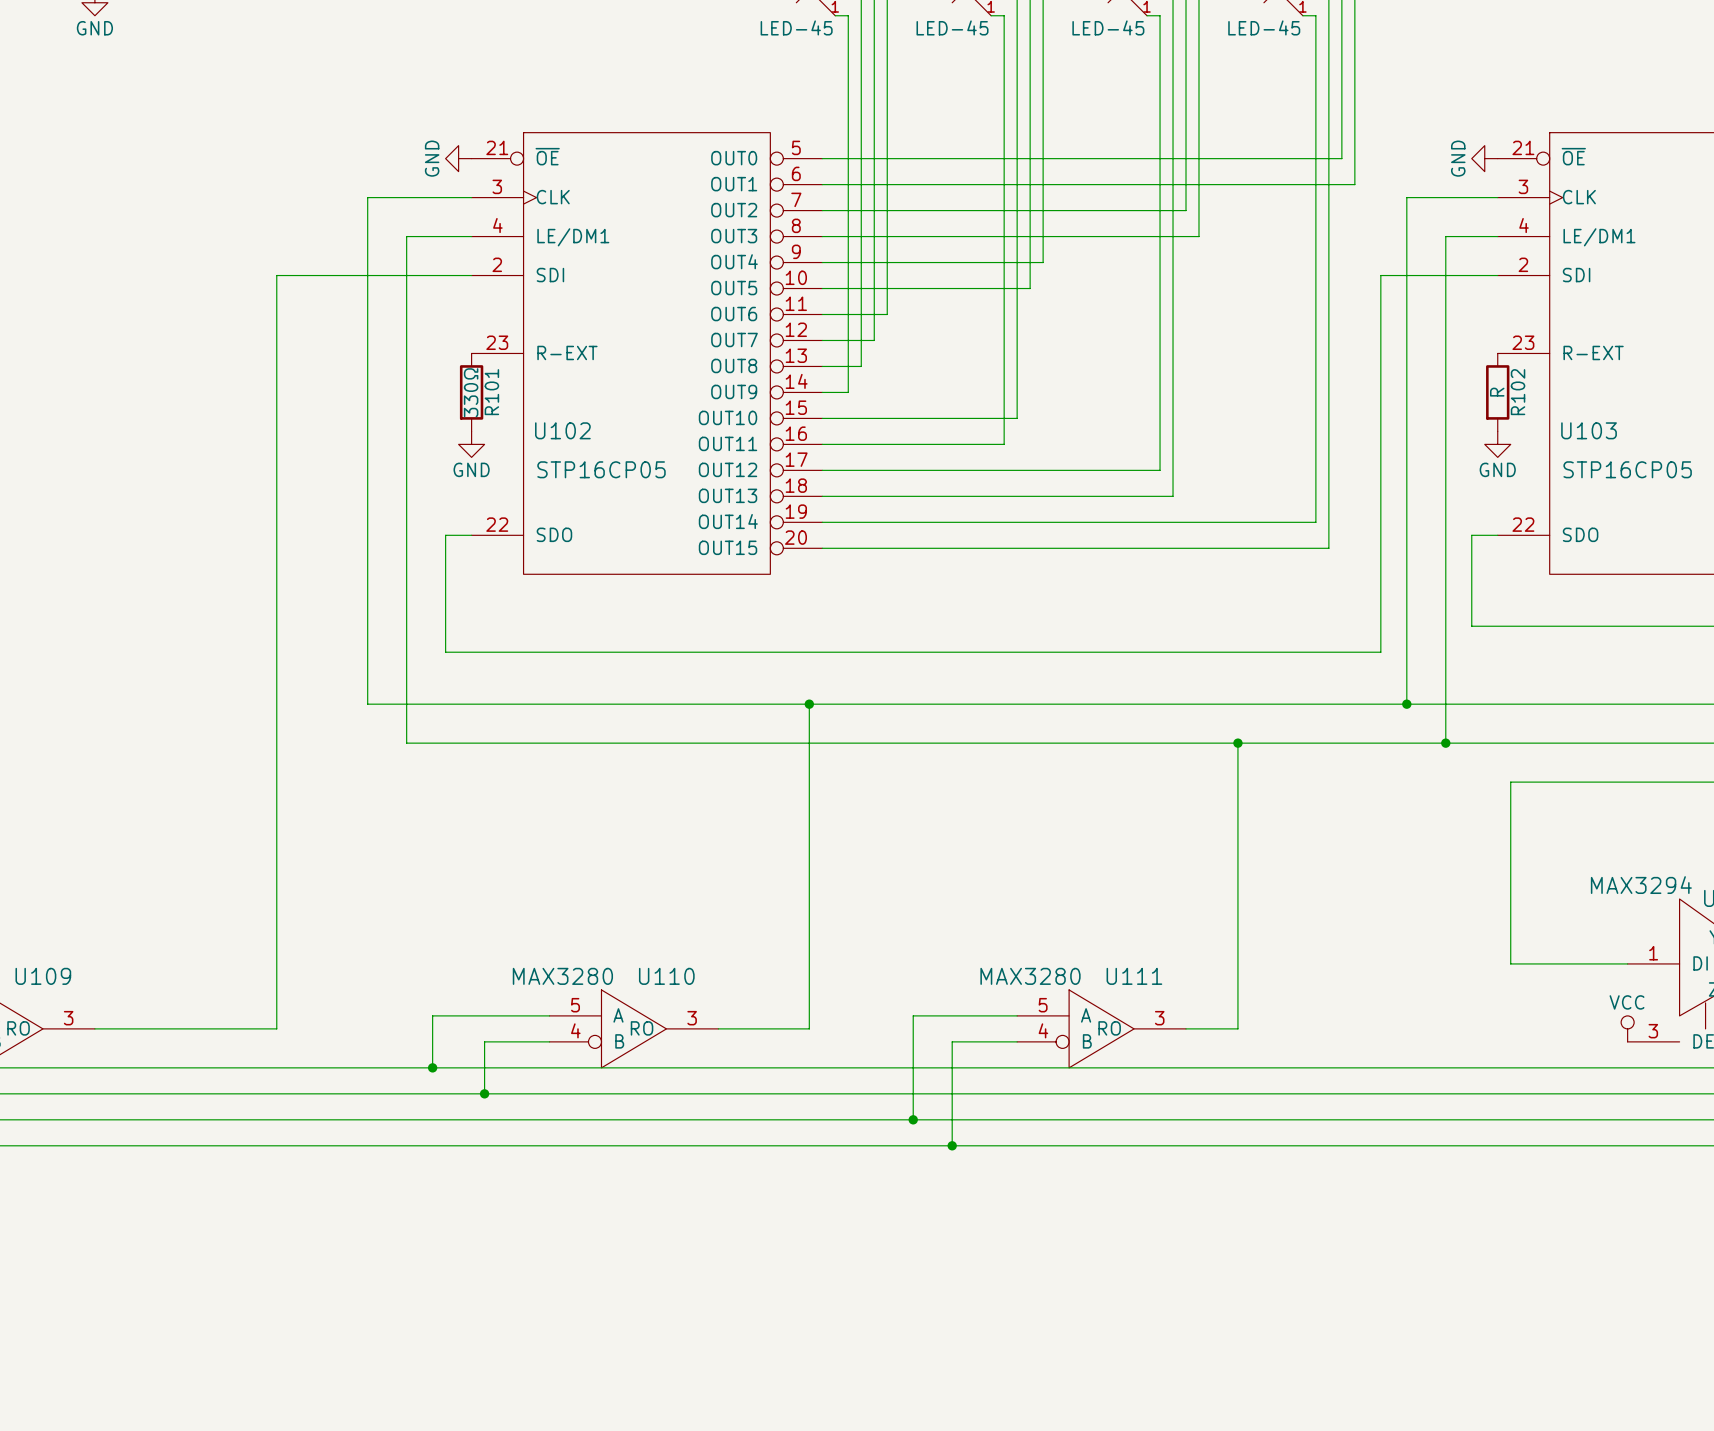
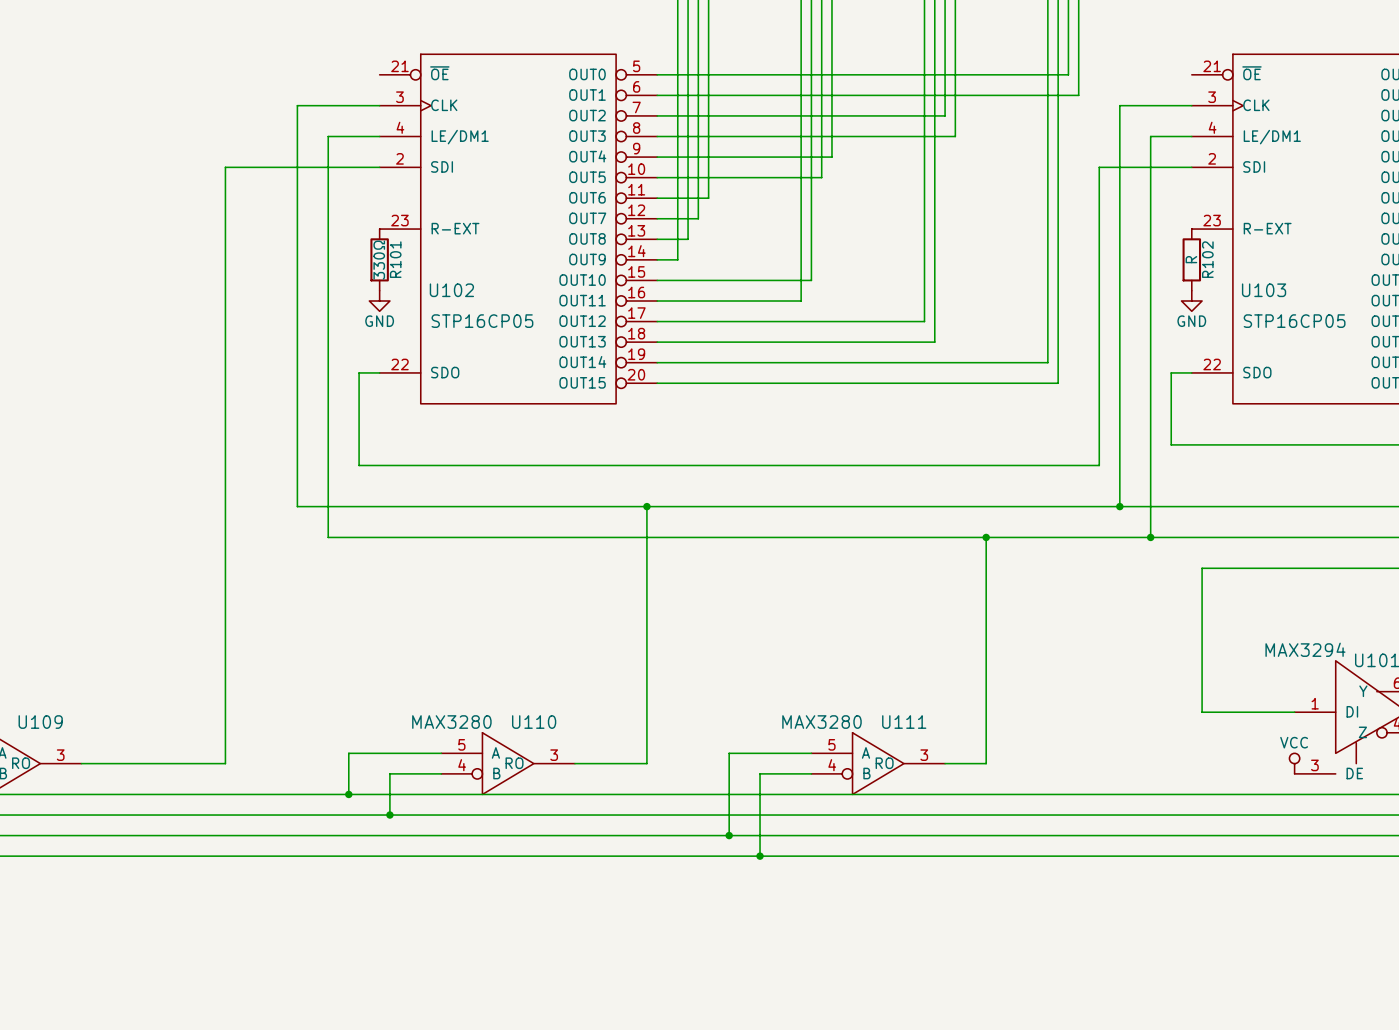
power symbol: GND (458, 158) -> none
power symbol: GND (1484, 158) -> none

